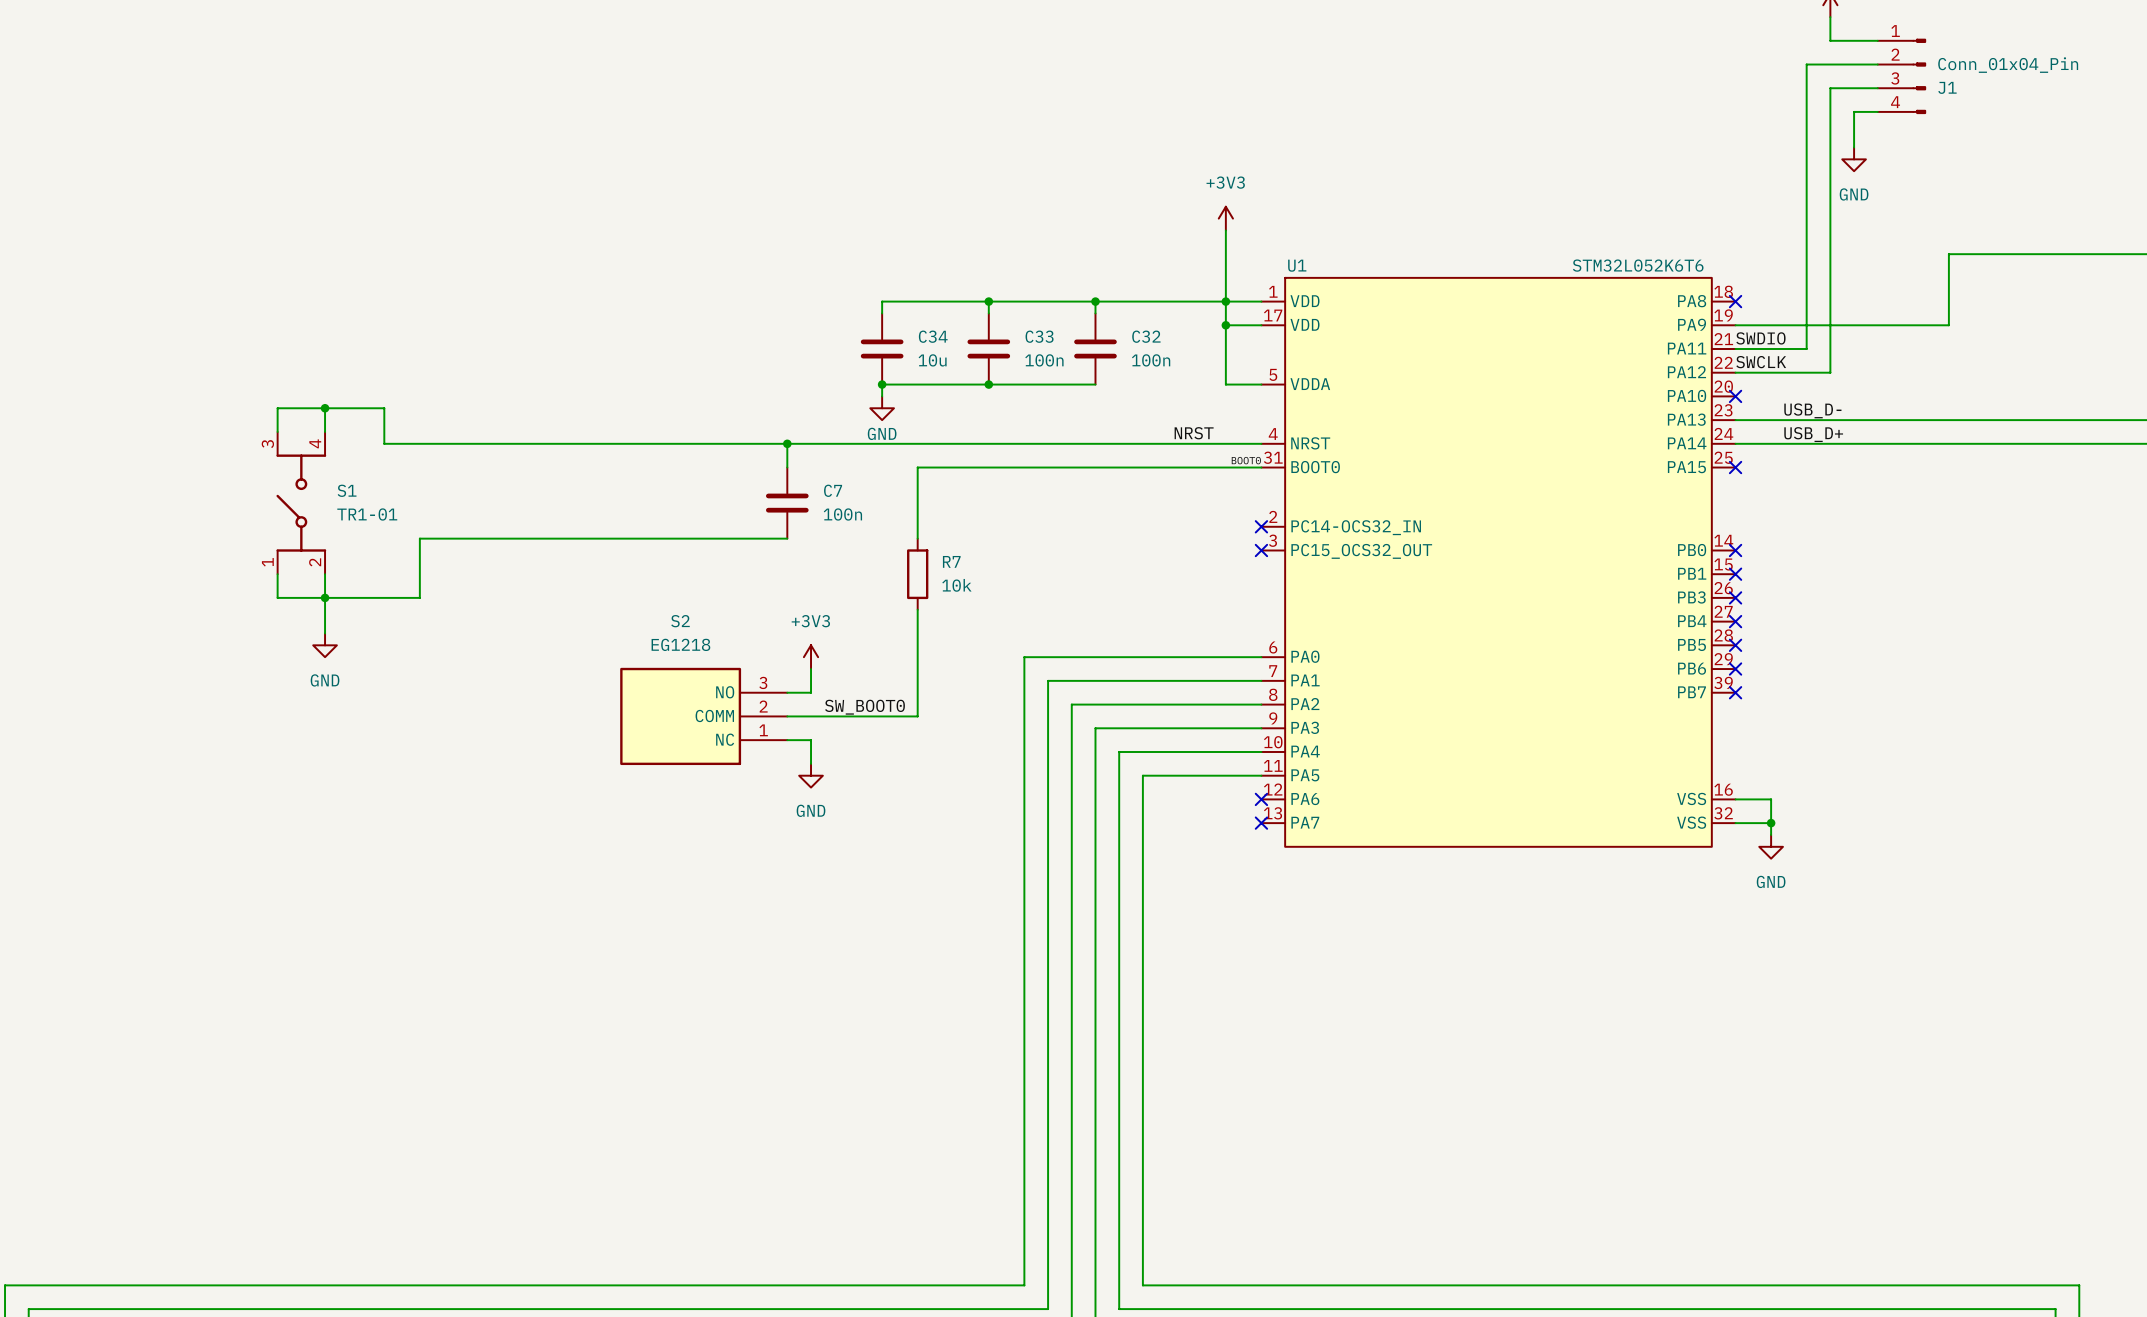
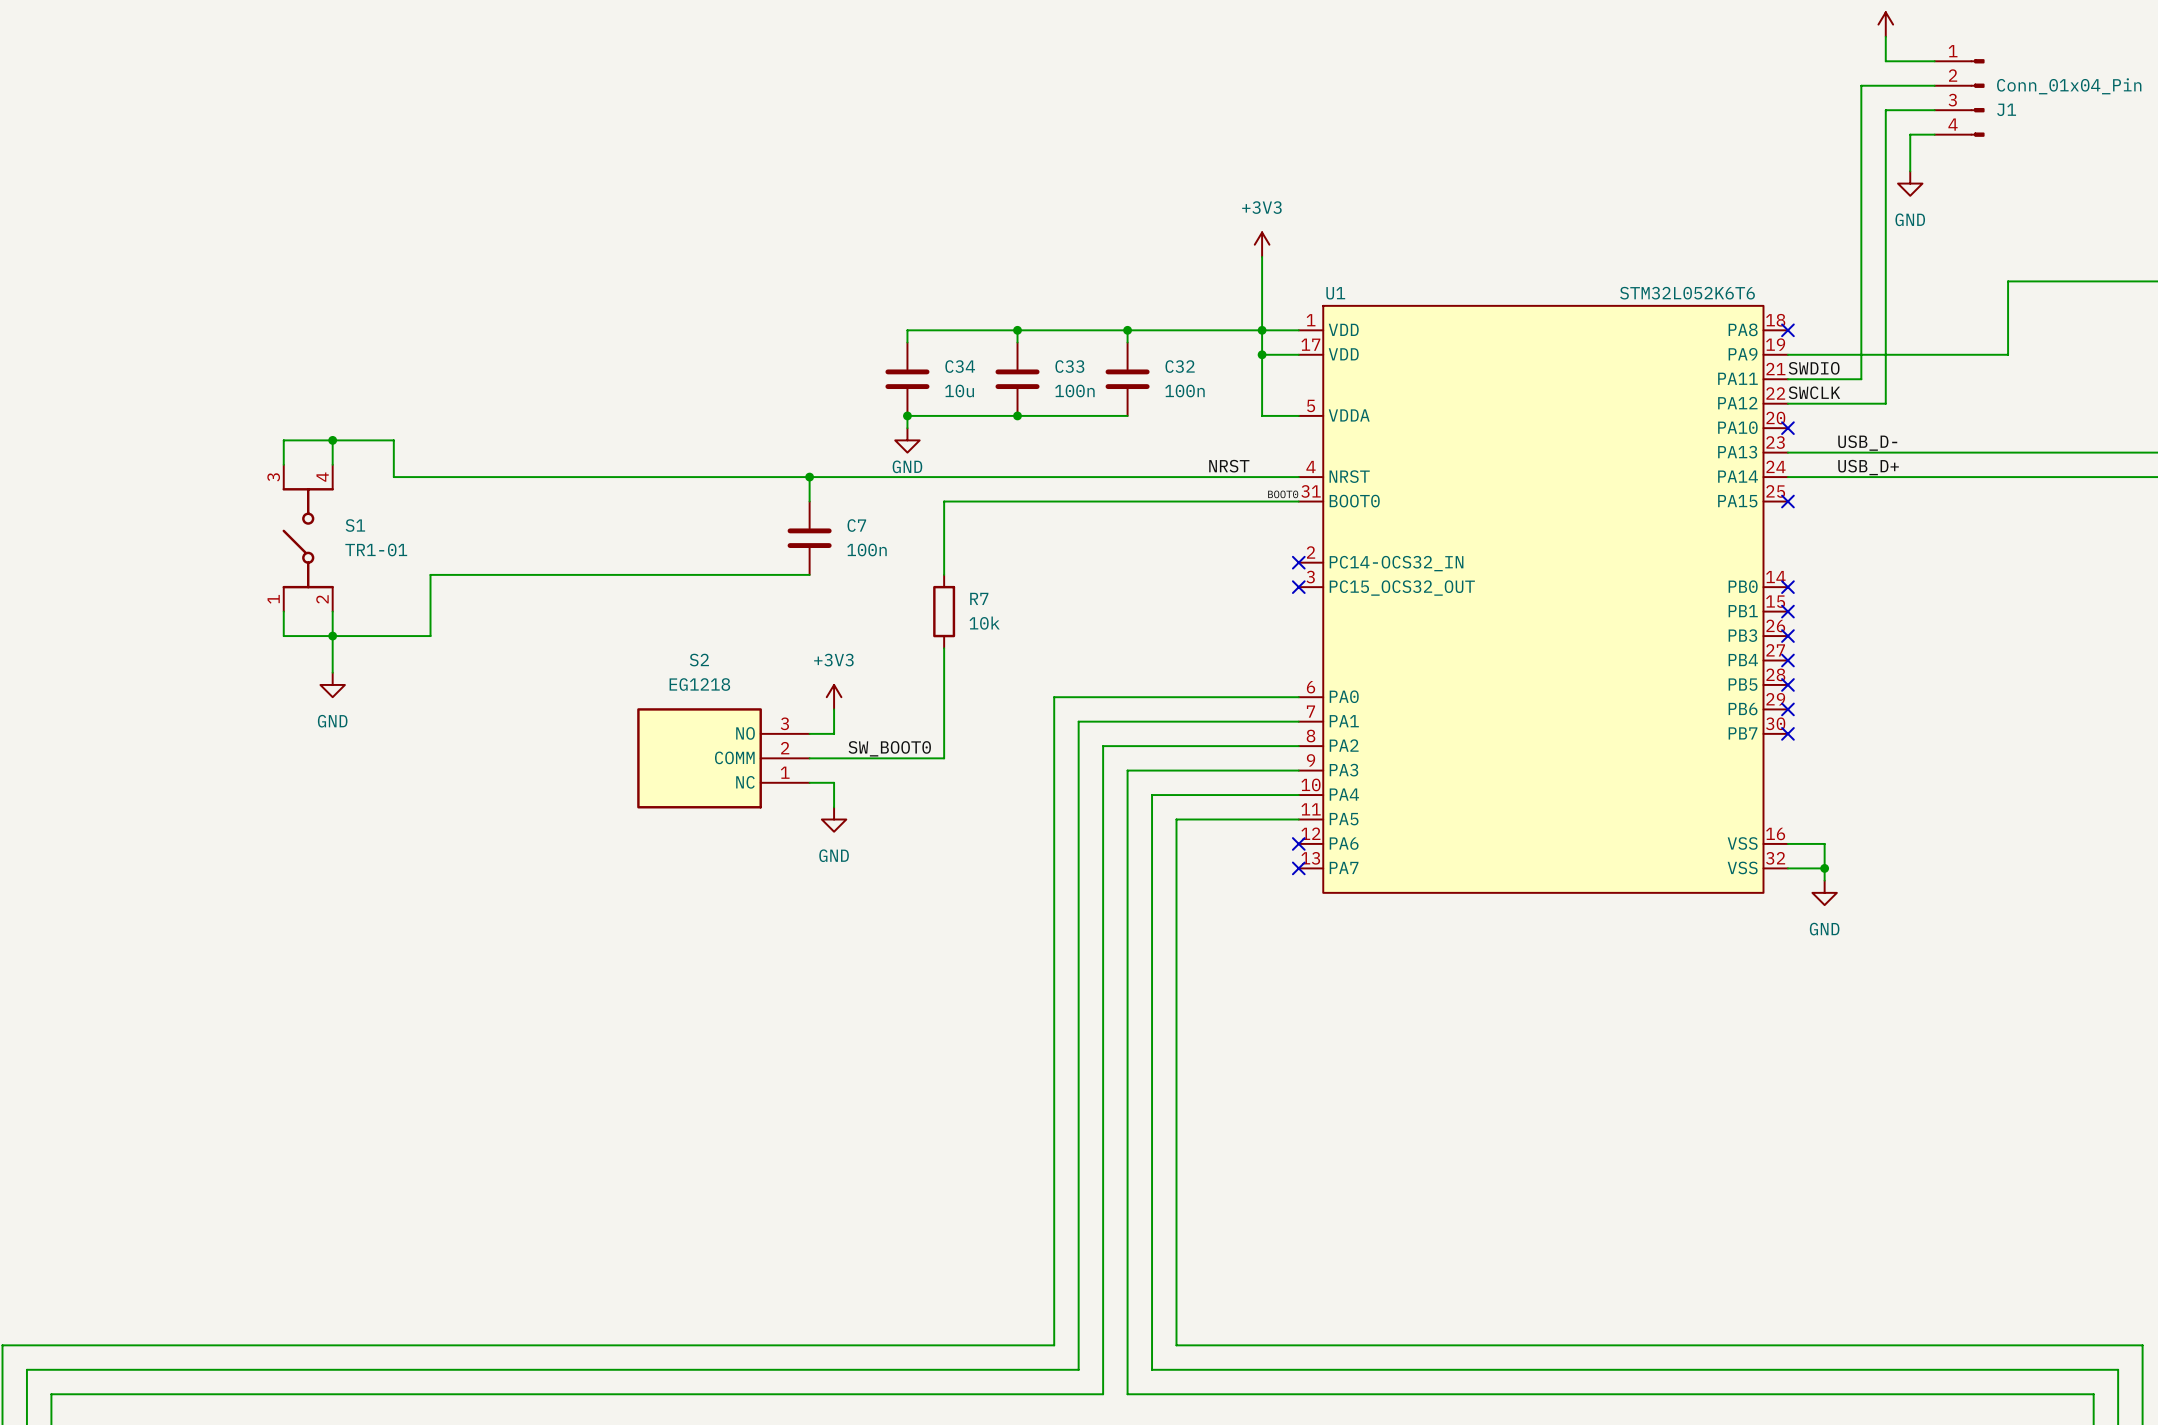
U1 pin number: 39 (1723, 682) -> 30 (1775, 723)

